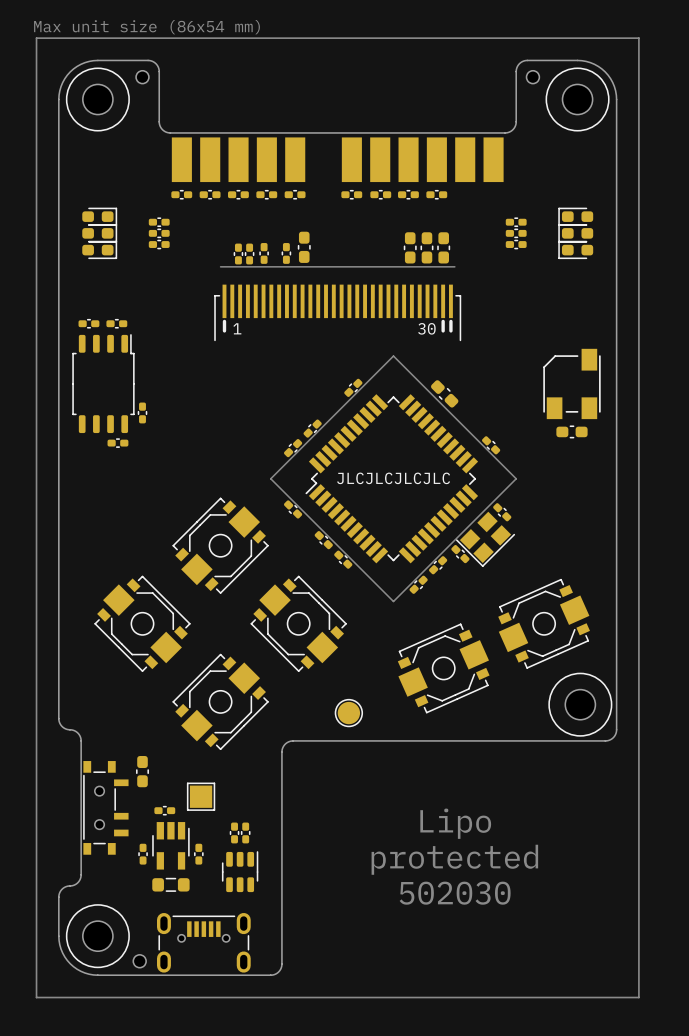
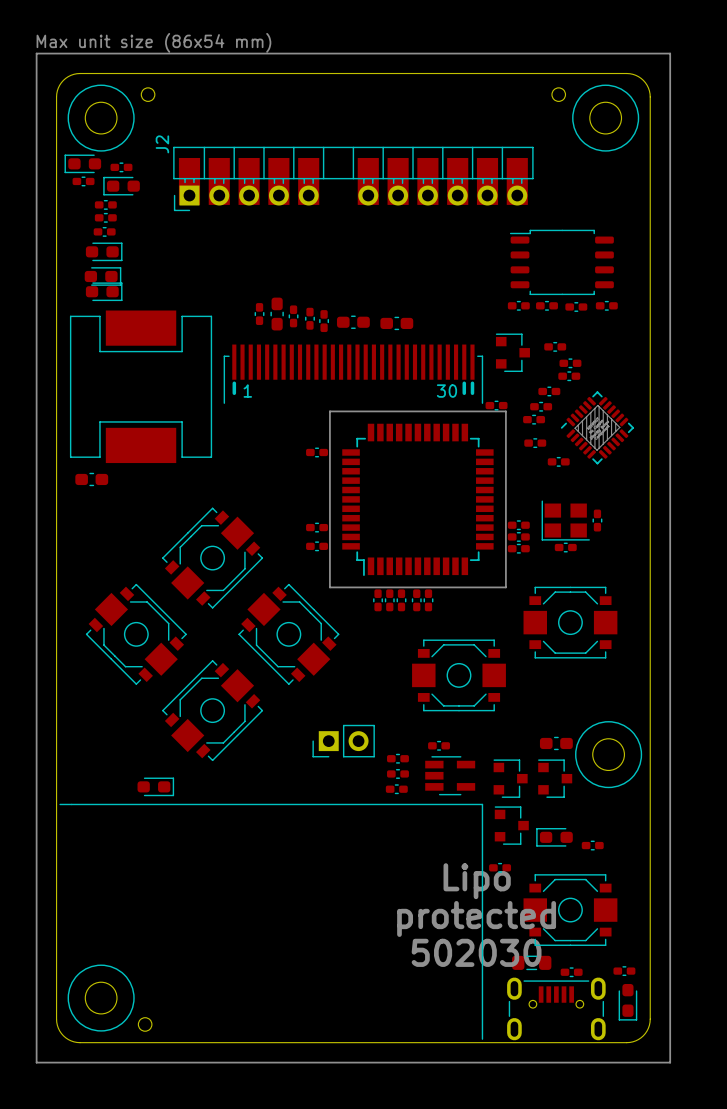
board edge: (97, 60) (149, 60) (155, 63) (159, 70) (159, 124) (163, 130) (169, 132) (507, 132) (513, 128) (516, 123) (516, 69) (519, 63) (526, 60) (577, 60) (590, 62) (608, 75) (615, 90) (615, 733) (612, 738) (605, 740) (293, 740) (287, 742) (281, 752) (281, 965) (279, 971) (273, 974) (93, 974) (80, 971) (70, 963) (59, 944) (59, 893) (64, 887) (76, 883) (81, 876) (81, 740) (76, 732) (62, 726) (58, 718) (58, 99) (62, 82) (70, 71) (84, 62) (97, 60) -> (80, 73) (71, 75) (63, 80) (58, 87) (56, 96) (56, 1019) (59, 1030) (68, 1039) (80, 1042) (626, 1042) (638, 1039) (647, 1030) (650, 1019) (650, 96) (647, 85) (638, 76) (626, 73) (80, 73)
part: none -> (82, 163)
part: none -> (121, 167)
J2: none -> (353, 178)
part: none -> (83, 181)
part: none -> (121, 186)
part: none -> (105, 204)
part: none -> (105, 217)
part: (181, 194) -> none
part: (210, 194) -> none
part: (238, 194) -> none
part: (266, 194) -> none
part: (295, 194) -> none
part: (351, 194) -> none
part: (380, 194) -> none
part: (408, 194) -> none
part: (436, 194) -> none
part: none -> (104, 231)
part: (99, 216) -> none
part: (575, 216) -> none
part: (159, 222) -> none
part: (516, 222) -> none
part: none -> (104, 251)
part: (99, 233) -> none
part: (159, 233) -> none
part: (516, 233) -> none
part: (575, 233) -> none
part: none -> (561, 262)
part: (159, 244) -> none
part: (516, 244) -> none
part: (304, 247) -> none
part: (410, 247) -> none
part: (426, 247) -> none
part: (443, 247) -> none
part: (575, 250) -> none
part: (264, 253) -> none
part: (286, 253) -> none
part: (238, 254) -> none
part: (249, 254) -> none
part: none -> (104, 291)
line: (220, 266) (454, 266) -> none
part: none -> (518, 305)
part: none -> (546, 305)
part: none -> (606, 305)
part: none -> (576, 306)
part: none -> (259, 314)
part: none -> (277, 314)
part: none -> (293, 316)
part: none -> (309, 318)
part: none -> (324, 321)
part: none -> (353, 322)
part: none -> (396, 323)
part position: (337, 312) -> (353, 374)
part: none -> (555, 346)
part: none -> (512, 352)
part: (88, 323) -> none
part: (116, 323) -> none
part: none -> (570, 363)
part: none -> (569, 376)
part footprint: [543, 348, 601, 420] -> [560, 391, 635, 465]
part: none -> (141, 386)
line: (393, 356) (516, 478) (393, 601) (270, 478) (393, 356) -> none
part: none -> (549, 391)
part: none -> (496, 405)
part: none -> (541, 406)
line: none -> (329, 411) (505, 411) (505, 587) (329, 587) (329, 411)
part: (103, 383) -> none
part: none -> (534, 419)
part: (353, 387) -> none
part: (444, 393) -> none
part: none -> (535, 443)
part: (142, 412) -> none
part: none -> (317, 452)
part: none -> (558, 461)
part: (312, 428) -> none
part: (571, 431) -> none
part: none -> (91, 479)
part: (117, 443) -> none
part: (491, 445) -> none
part: (293, 448) -> none
part: none -> (417, 499)
part: (391, 478) -> none
text: JLCJLCJLCJLC (393, 478) -> none
part: none -> (565, 520)
part: none -> (597, 520)
part: none -> (518, 525)
part: none -> (317, 527)
part: none -> (518, 536)
part: none -> (565, 547)
part rotation: 0° (293, 509) -> 45° counterclockwise (317, 546)
part rotation: 0° (502, 512) -> 45° counterclockwise (518, 548)
part: (485, 539) -> none
part: (323, 540) -> none
part position: (220, 545) -> (212, 558)
part: (460, 554) -> none
part: none -> (378, 600)
part: none -> (389, 600)
part: none -> (401, 600)
part: none -> (416, 600)
part: none -> (428, 600)
part: (343, 559) -> none
part: (438, 565) -> none
part: none -> (570, 622)
part: (418, 584) -> none
part: none -> (288, 634)
part position: (142, 623) -> (136, 634)
part: (298, 623) -> none
part: (544, 623) -> none
part: none -> (458, 675)
part: none -> (212, 710)
part: (443, 668) -> none
part: none -> (343, 741)
part: none -> (556, 743)
part: none -> (439, 745)
part: (220, 701) -> none
part: none -> (397, 758)
part: (348, 713) -> none
part: none -> (397, 773)
part: none -> (450, 775)
part: none -> (510, 778)
part: none -> (555, 778)
part: none -> (155, 786)
part: none -> (396, 789)
line: none -> (60, 804) (482, 804) (482, 1039)
part: (142, 771) -> none
part: none -> (511, 825)
part: none -> (554, 837)
part: none -> (592, 845)
part: (201, 796) -> none
part: (105, 807) -> none
part: (164, 810) -> none
part: none -> (500, 867)
part: (234, 832) -> none
part: (245, 832) -> none
part: (170, 845) -> none
part: none -> (570, 910)
part: (143, 854) -> none
part: (198, 854) -> none
part: (240, 871) -> none
part: (170, 884) -> none
part: none -> (531, 962)
part: none -> (624, 971)
part: none -> (571, 972)
part: none -> (627, 1002)
part: (203, 942) -> none
part: none -> (556, 1008)

